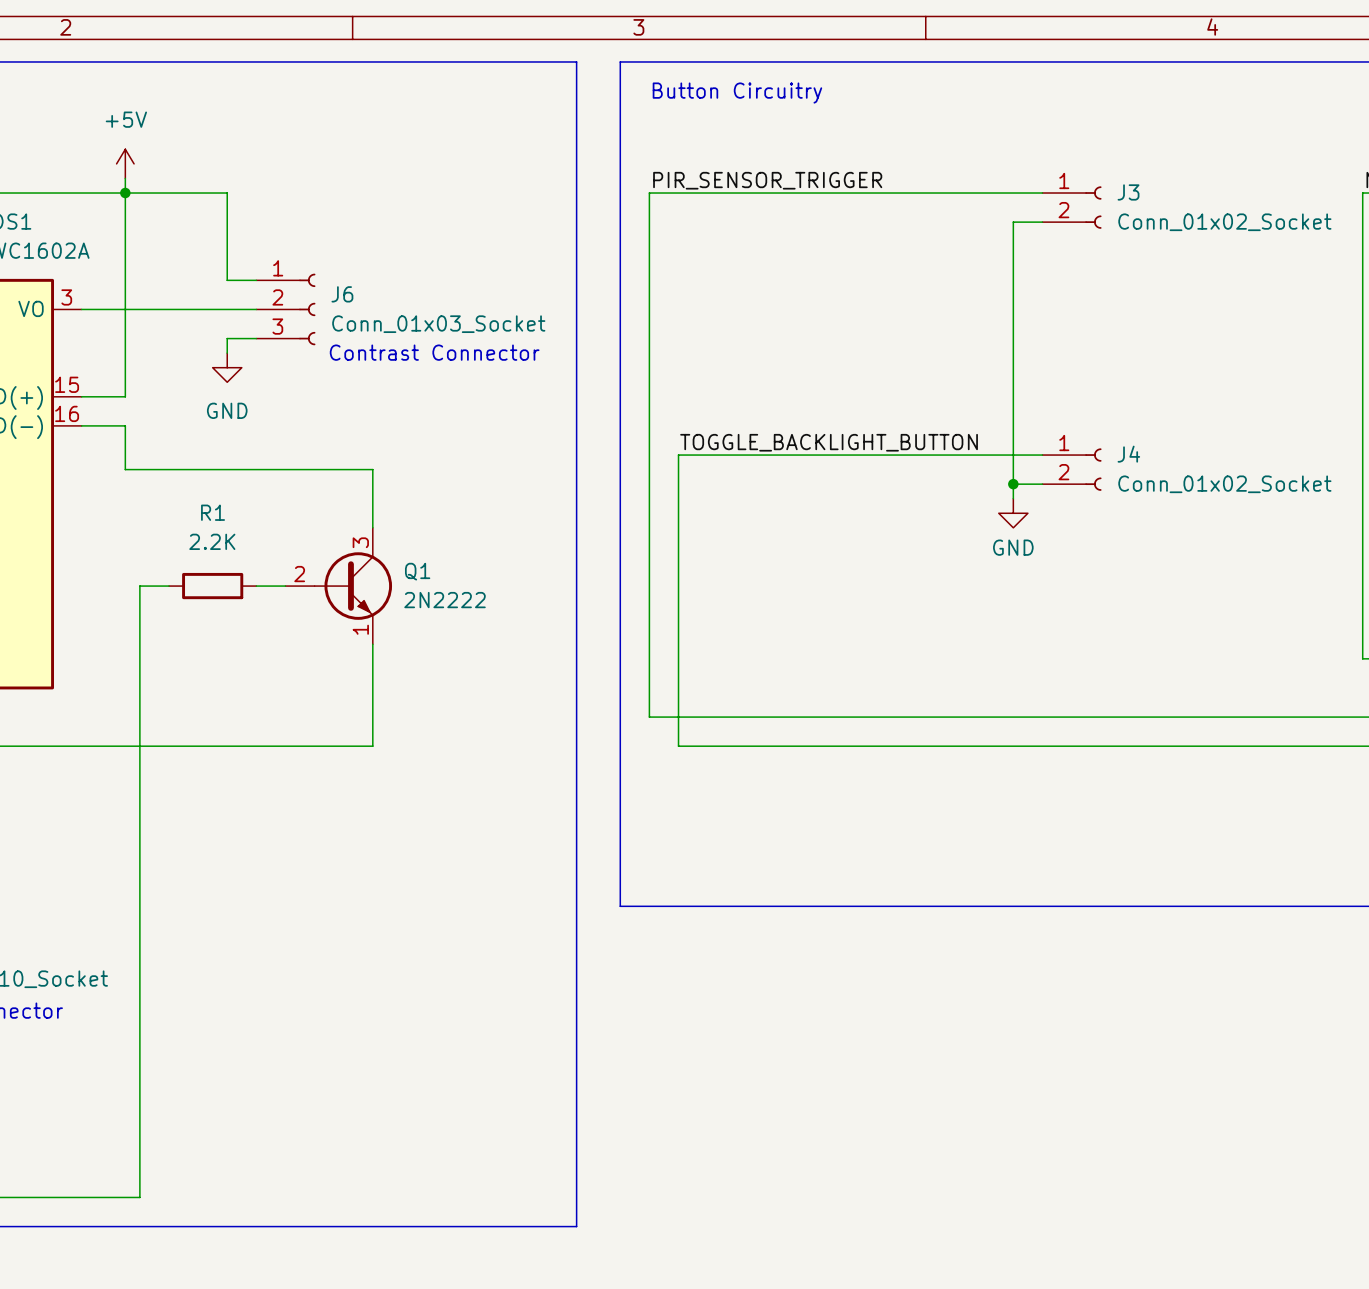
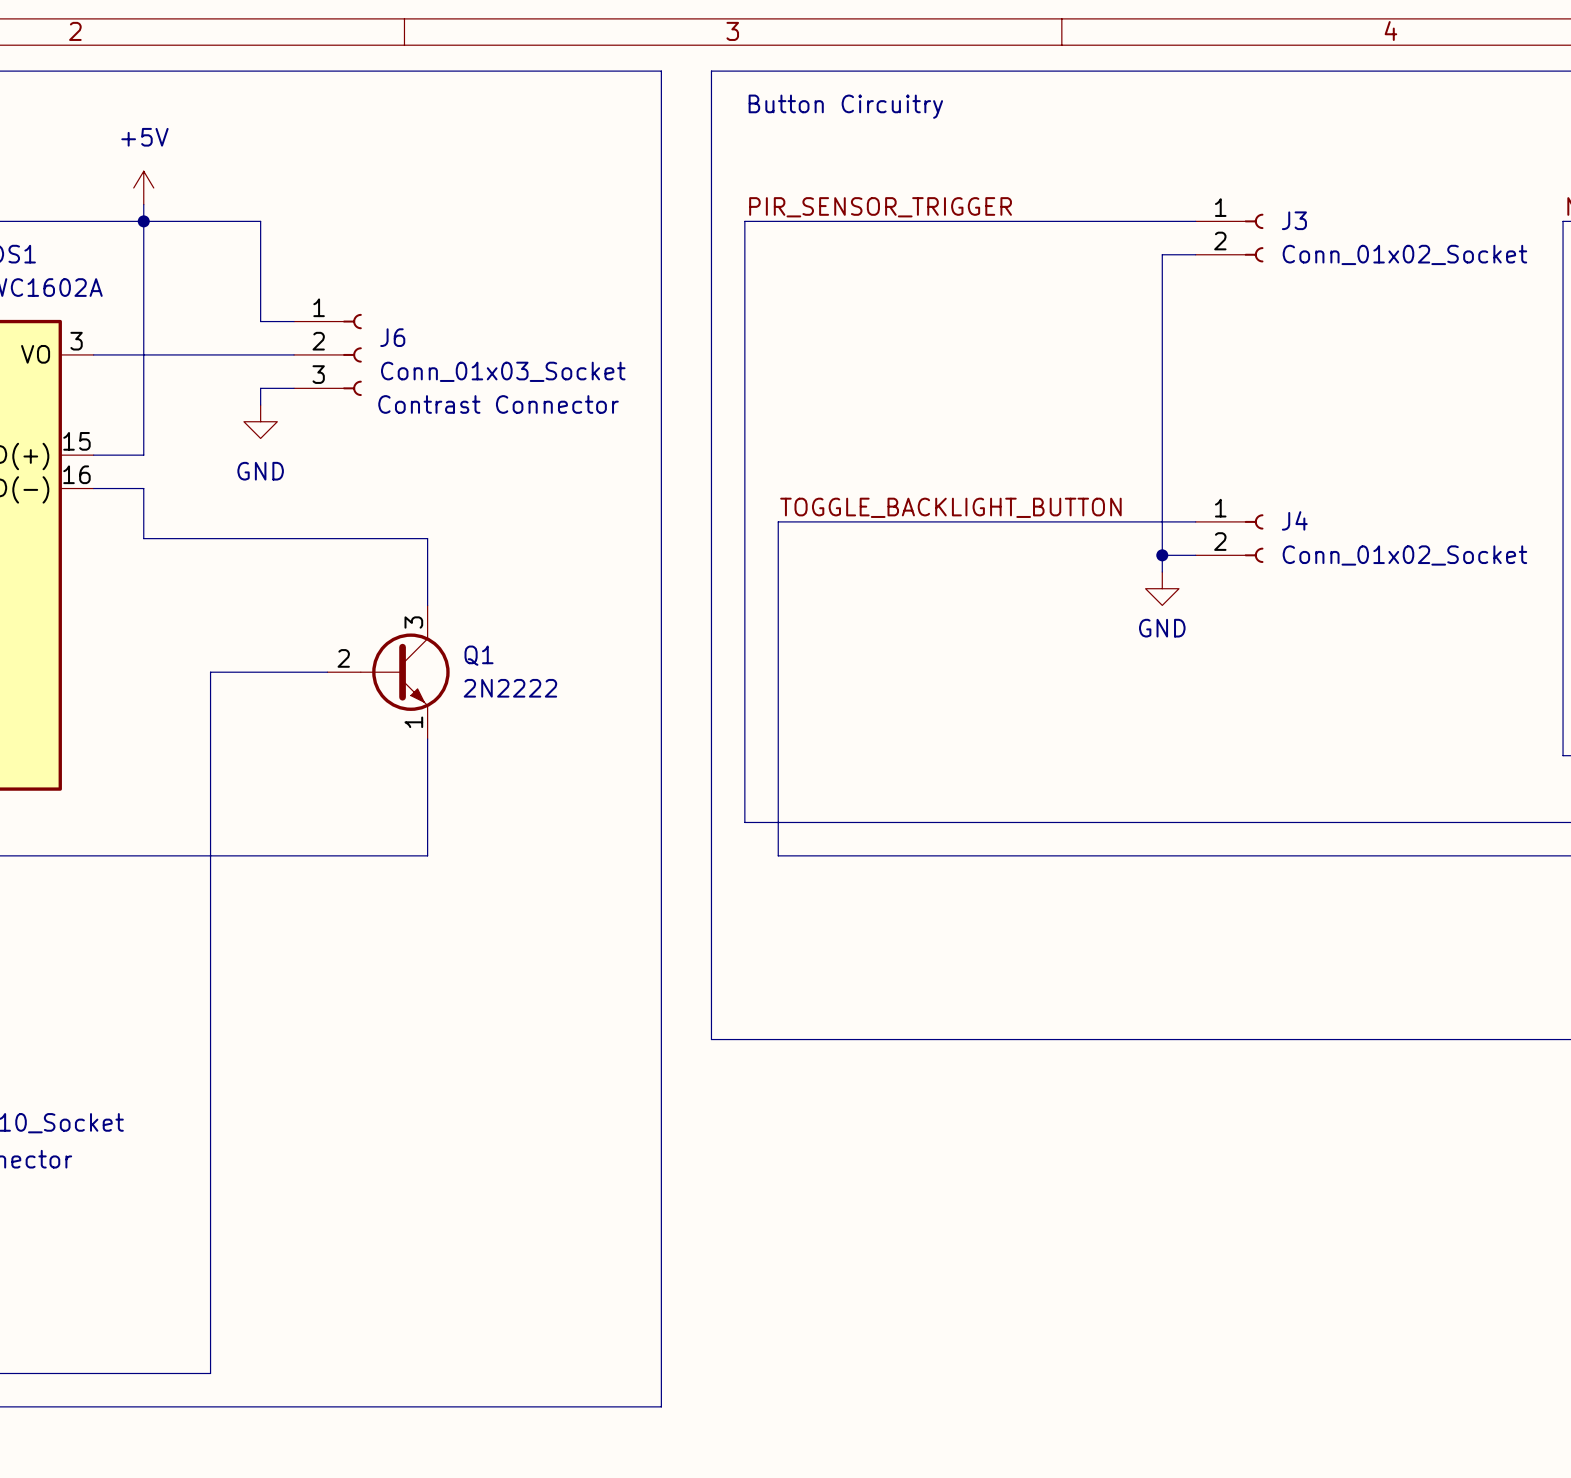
wire: (169, 586) (139, 586) (139, 1197) -> (294, 672) (210, 672) (210, 1373) (160, 1373)
R1: 2.2K (212, 586) -> none

